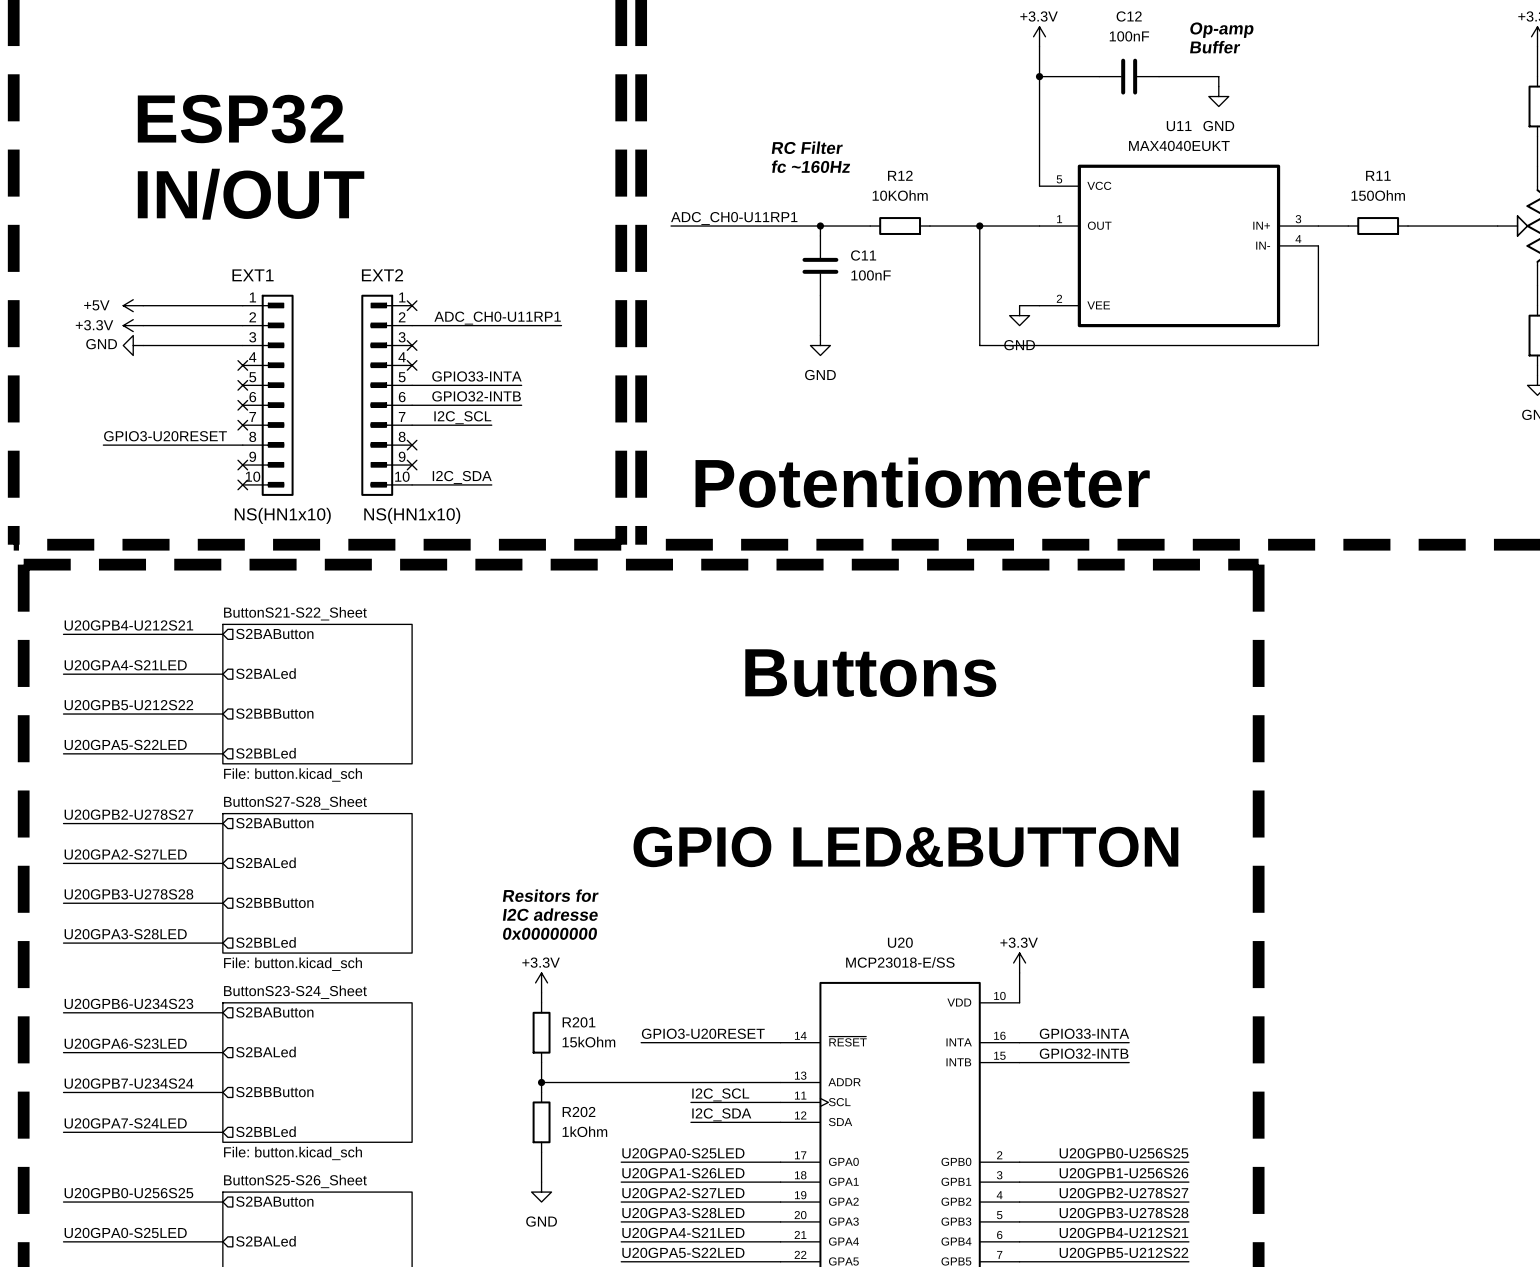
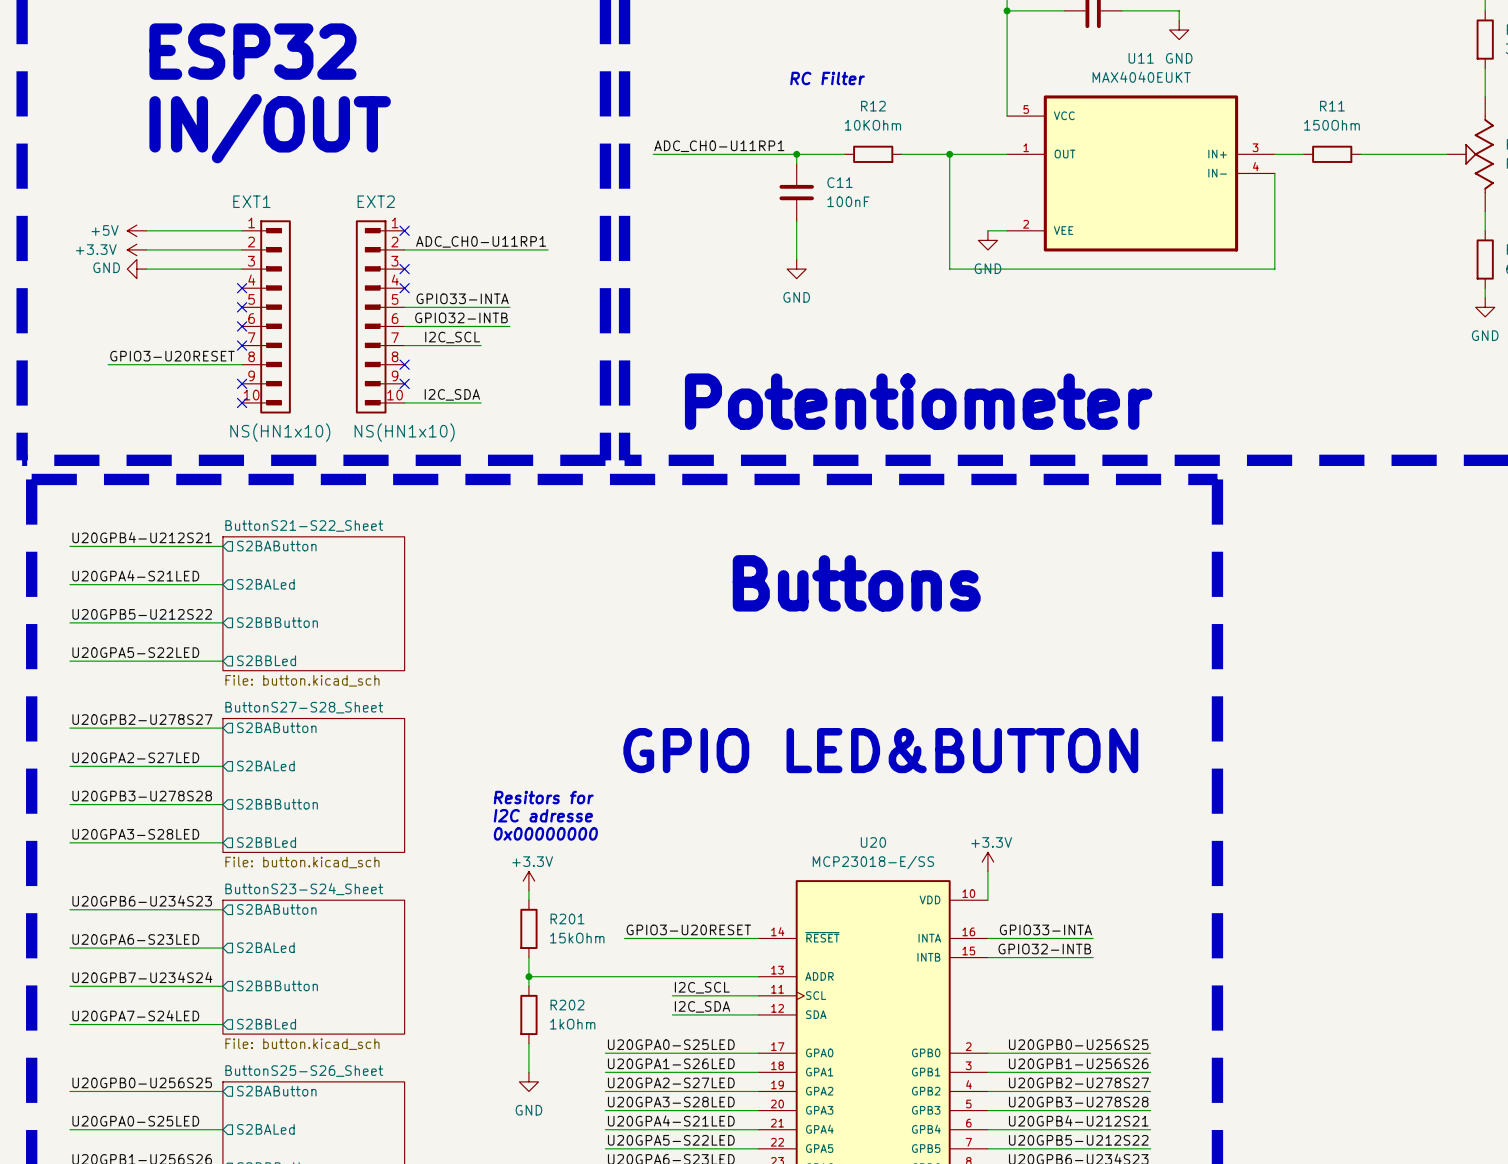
text position: RC Filter (807, 147) -> RC Filter (827, 78)
text: fc ~160Hz (810, 166) -> none

